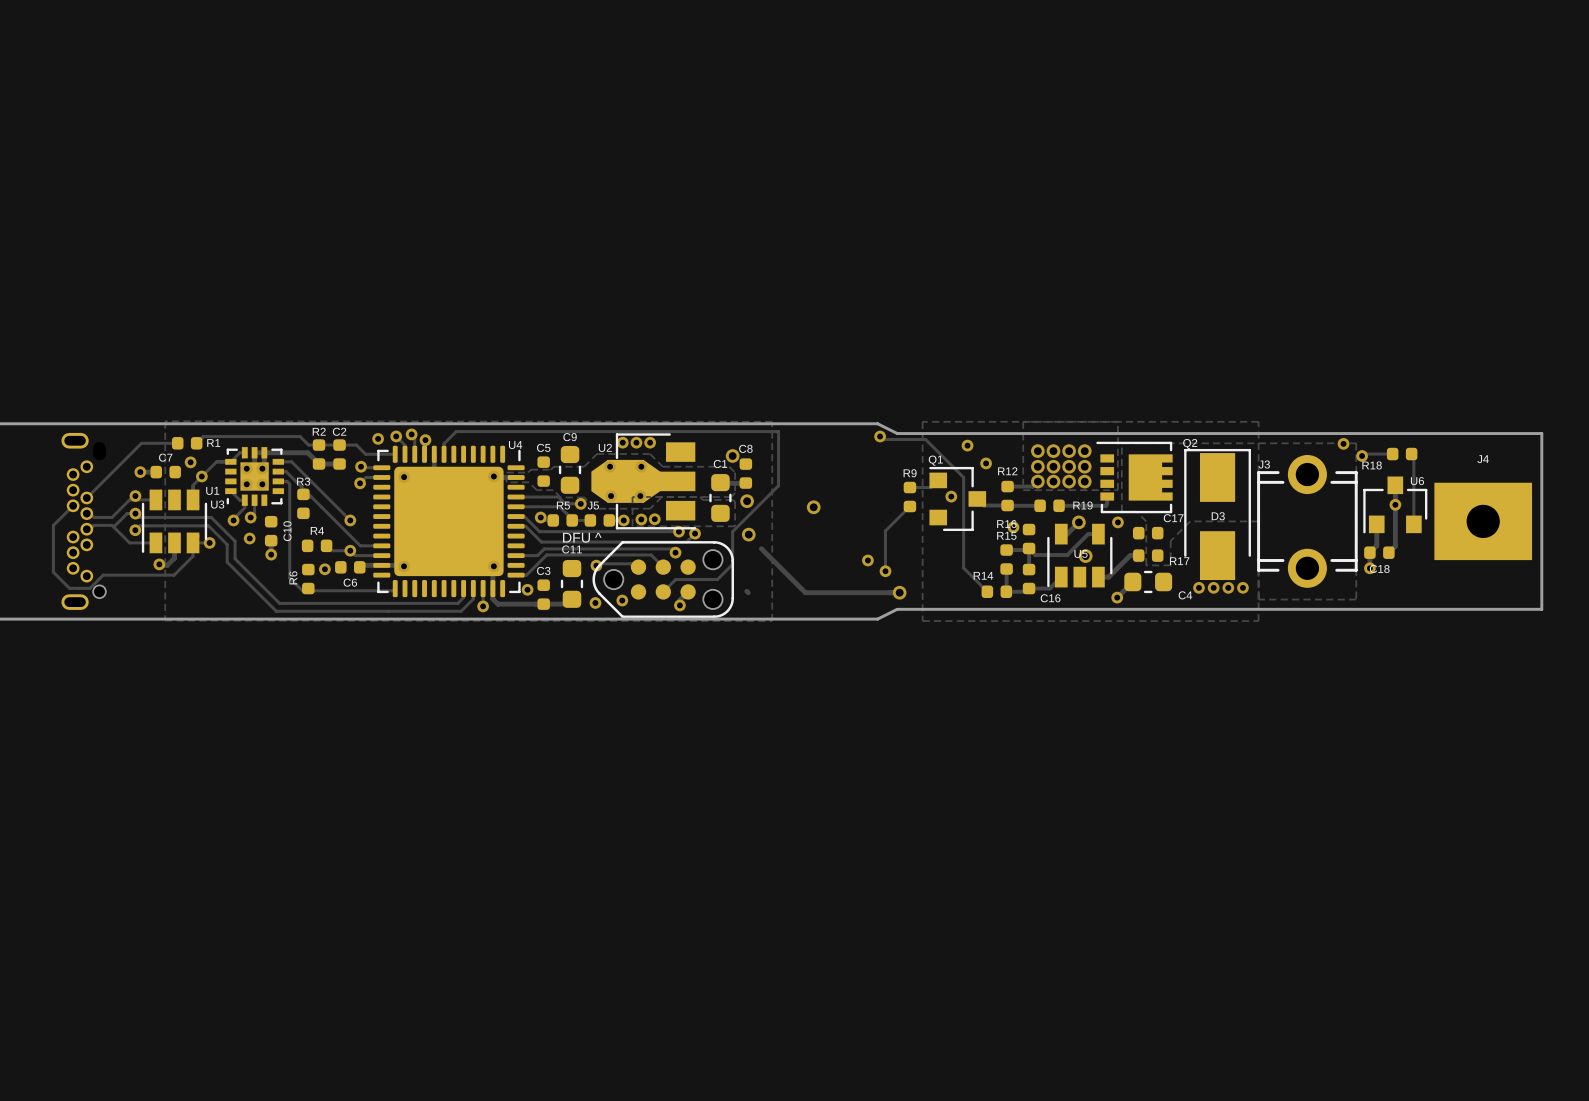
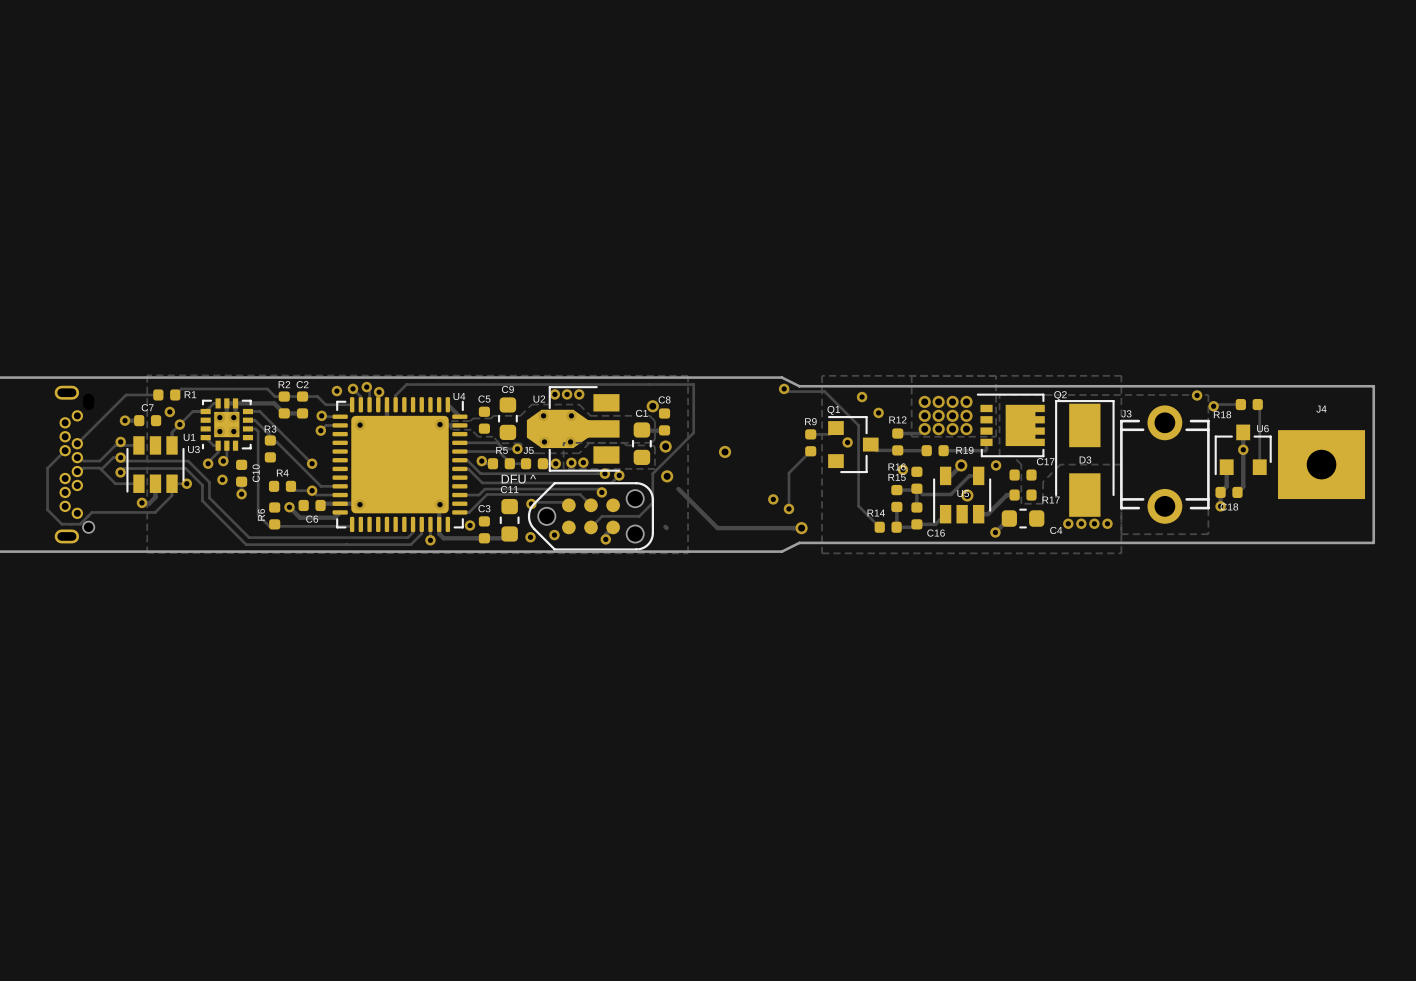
track: none -> (447, 404) (459, 416)
track: none -> (289, 507) (299, 517) (334, 517) (340, 512)

